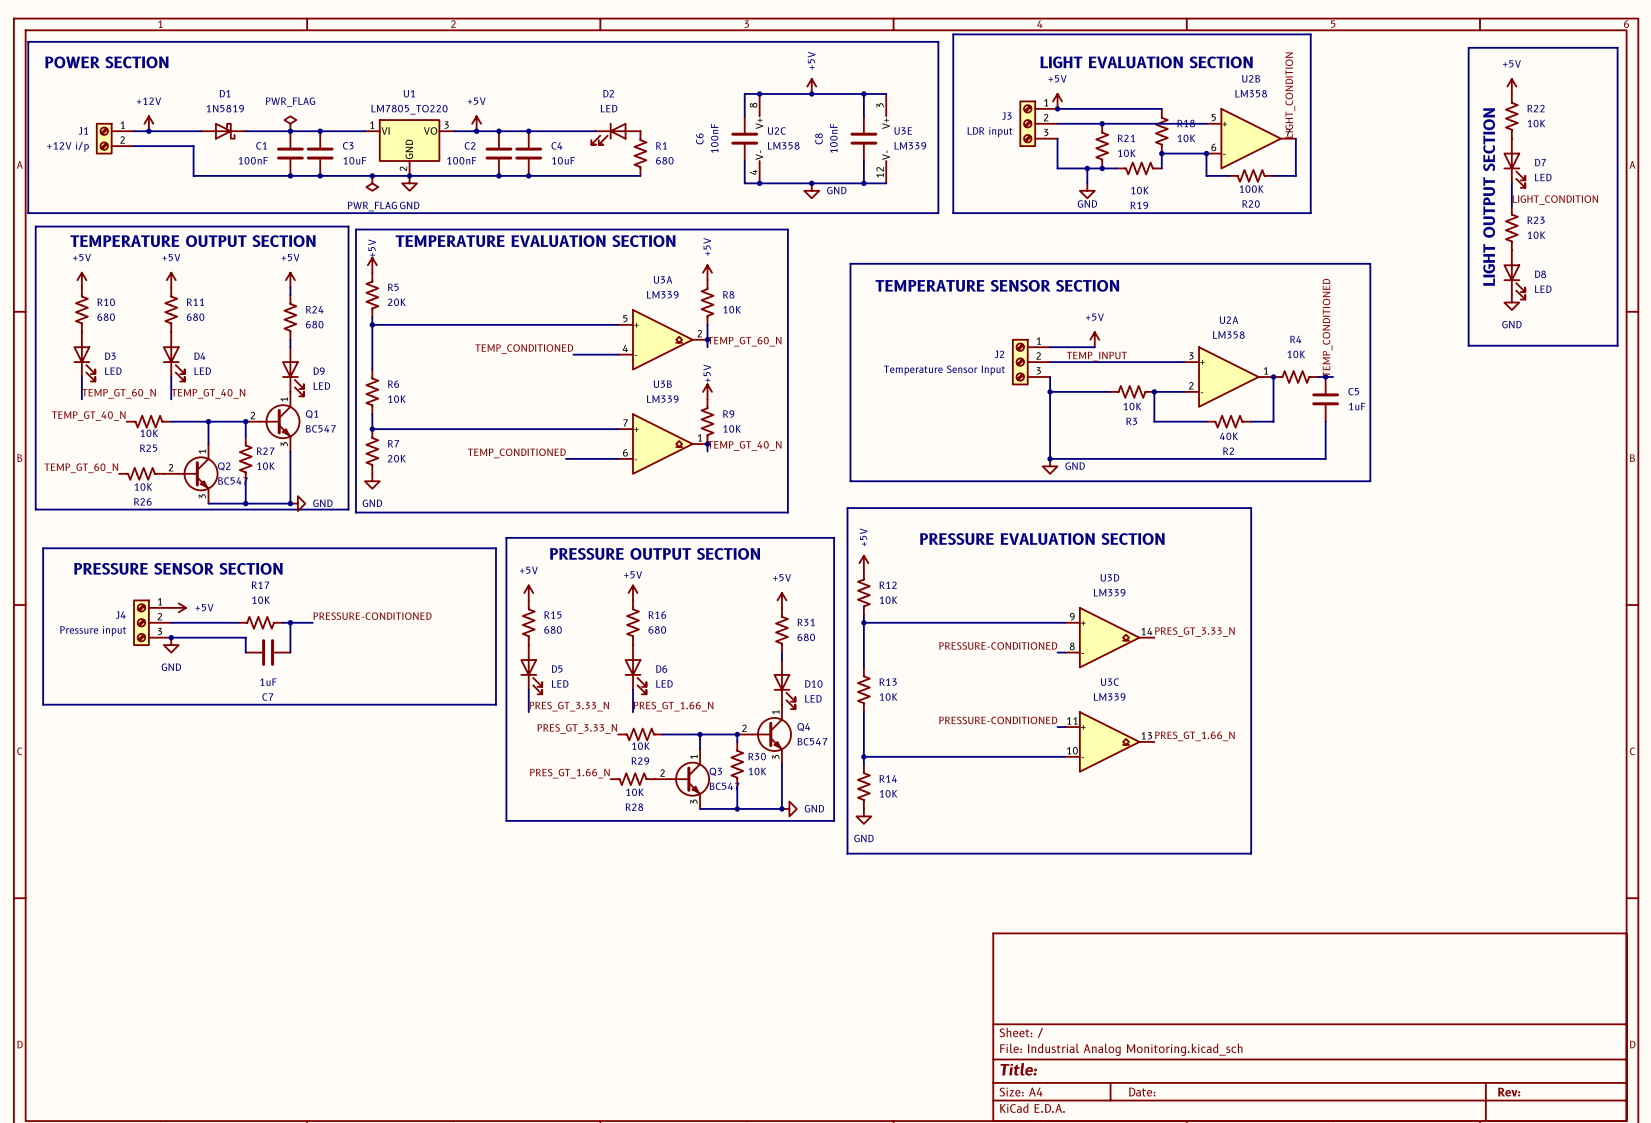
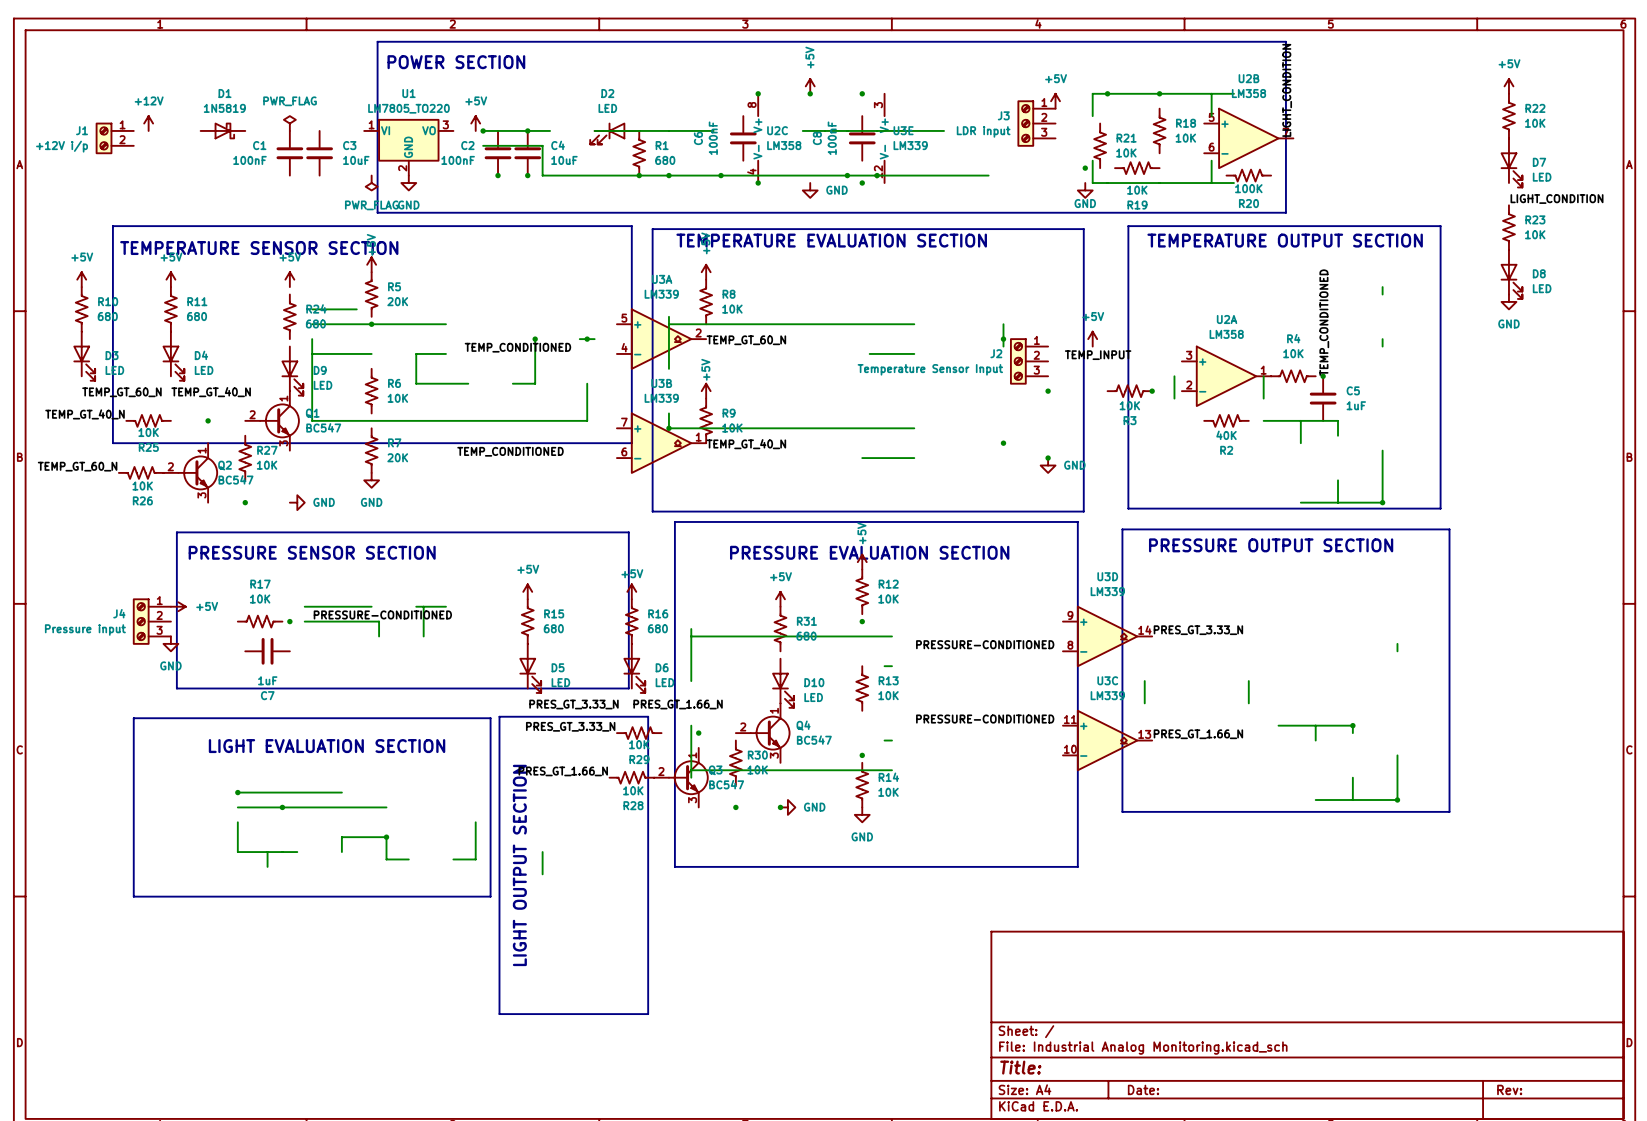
line: (378, 41) (28, 41) (28, 213) (378, 213) -> (377, 41) (377, 212)
line: (938, 41) (938, 213) -> (951, 212) (936, 212)
line: (1468, 47) (1617, 47) (1617, 345) (1468, 345) (1468, 47) -> none
text: POWER SECTION (106, 62) -> none
text: none -> POWER SECTION (456, 62)
text: LIGHT EVALUATION SECTION (1146, 62) -> none
wire: (863, 93) (863, 116) -> none
wire: (886, 93) (744, 93) (744, 116) -> none
junction: none -> (1107, 93)
junction: none -> (1159, 93)
wire: none -> (1211, 93) (1211, 116)
wire: none -> (1233, 93) (1092, 93) (1092, 116)
wire: (1057, 108) (1161, 108) -> none
junction: (1057, 108) -> none
wire: (1057, 123) (1206, 123) -> none
junction: (1102, 123) -> none
wire: (134, 131) (201, 131) -> none
junction: (148, 131) -> none
wire: (245, 131) (364, 131) -> none
junction: (290, 131) -> none
junction: (320, 131) -> none
wire: (454, 131) (484, 131) -> none
junction: (476, 131) -> none
junction: none -> (483, 130)
junction: (498, 131) -> none
wire: (551, 131) (595, 131) -> (713, 130) (594, 130)
wire: none -> (802, 130) (944, 130)
wire: (1057, 138) (1057, 168) (1117, 168) -> none
wire: (1295, 138) (1295, 175) (1273, 175) -> none
wire: (134, 146) (193, 146) (193, 175) (543, 175) -> (483, 145) (542, 145) (542, 175)
junction: (1161, 153) -> none
junction: (1206, 153) -> none
wire: (744, 161) (744, 183) (886, 183) -> none
wire: (863, 161) (863, 183) -> none
wire: none -> (1092, 160) (1092, 183) (1233, 183)
wire: none -> (1211, 160) (1211, 183)
wire: (1087, 168) (1087, 183) -> none
junction: (1102, 168) -> none
wire: (1161, 168) (1161, 153) (1206, 153) (1206, 175) (1228, 175) -> none
junction: (290, 175) -> none
junction: (320, 175) -> none
junction: (372, 175) -> none
junction: (409, 175) -> none
wire: none -> (639, 175) (988, 175)
junction: none -> (639, 175)
junction: none -> (668, 175)
junction: none -> (721, 175)
junction: none -> (847, 175)
junction: none -> (877, 175)
junction: (811, 183) -> none
wire: (1511, 183) (1511, 205) -> none
text: LIGHT OUTPUT SECTION (1489, 197) -> none
line: (953, 213) (953, 34) (1310, 34) (1310, 213) (1288, 213) -> (936, 41) (1285, 41) (1285, 212)
line: (113, 226) (35, 226) (35, 509) (348, 509) (348, 226) -> (112, 226) (112, 443) (631, 443) (631, 226) (347, 226)
line: none -> (1128, 226) (1440, 226) (1440, 508) (1128, 508) (1128, 226)
line: (653, 229) (355, 229) (355, 512) (653, 512) -> (652, 229) (652, 511)
line: (787, 229) (787, 512) -> (786, 229) (1083, 229) (1083, 511) (786, 511)
text: TEMPERATURE OUTPUT SECTION (192, 241) -> TEMPERATURE SENSOR SECTION (259, 248)
text: TEMPERATURE EVALUATION SECTION (535, 241) -> none
text: none -> TEMPERATURE EVALUATION SECTION (831, 240)
text: none -> TEMPERATURE OUTPUT SECTION (1285, 240)
line: (850, 263) (1370, 263) (1370, 481) (850, 481) (850, 263) -> none
text: TEMPERATURE SENSOR SECTION (997, 285) -> none
wire: (290, 287) (290, 295) -> none
wire: none -> (1382, 287) (1382, 294)
wire: none -> (312, 309) (356, 309)
wire: (372, 317) (372, 369) -> none
wire: none -> (668, 316) (668, 368)
wire: none -> (312, 324) (371, 324)
wire: (446, 324) (618, 324) -> none
wire: none -> (668, 324) (914, 324)
wire: (707, 324) (707, 347) -> none
wire: none -> (1003, 324) (1003, 346)
wire: (290, 339) (290, 347) -> none
wire: none -> (312, 339) (312, 420) (587, 420) (587, 383)
wire: none -> (535, 339) (535, 383) (512, 383)
junction: none -> (535, 339)
wire: none -> (579, 339) (594, 339)
junction: none -> (587, 339)
junction: (707, 339) -> none
junction: none -> (1003, 339)
wire: none -> (1382, 339) (1382, 346)
wire: (1050, 347) (1094, 347) -> none
wire: none -> (312, 353) (371, 353)
wire: none -> (445, 353) (416, 353) (416, 383) (468, 383)
wire: (573, 354) (618, 354) -> none
wire: none -> (869, 353) (914, 353)
wire: (1050, 362) (1184, 362) -> none
wire: (81, 376) (81, 399) -> none
wire: (171, 376) (171, 399) -> none
wire: (1050, 376) (1050, 458) (1325, 458) (1325, 421) -> none
wire: none -> (1174, 376) (1174, 398)
wire: none -> (1263, 376) (1263, 398)
wire: (1273, 376) (1273, 421) -> (1338, 435) (1338, 420) (1271, 420)
junction: (1273, 376) -> none
wire: (1318, 376) (1333, 376) -> none
wire: (1050, 391) (1109, 391) -> none
wire: (1184, 391) (1154, 391) (1154, 421) (1206, 421) -> none
wire: (372, 414) (372, 429) (618, 429) -> none
wire: none -> (668, 413) (668, 428) (914, 428)
wire: (171, 421) (245, 421) (245, 436) -> none
wire: (208, 421) (208, 444) -> none
junction: (245, 421) -> none
wire: (1251, 421) (1266, 421) -> none
wire: none -> (1300, 420) (1300, 443)
junction: (372, 429) -> none
junction: none -> (668, 428)
wire: (707, 444) (707, 451) -> none
junction: (707, 444) -> none
junction: none -> (1003, 443)
wire: (290, 451) (290, 503) (208, 503) -> none
wire: none -> (1382, 450) (1382, 502) (1300, 502)
wire: (565, 458) (618, 458) -> none
wire: none -> (862, 458) (914, 458)
wire: (245, 481) (245, 503) -> none
wire: none -> (1338, 480) (1338, 502)
junction: (290, 503) -> none
junction: none -> (1382, 502)
line: (847, 508) (1251, 508) (1251, 853) (847, 853) (847, 508) -> none
line: none -> (674, 521) (1077, 521) (1077, 866) (674, 866) (674, 521)
line: none -> (1122, 529) (1449, 529) (1449, 811) (1122, 811) (1122, 529)
line: (506, 537) (834, 537) (834, 820) (506, 820) (506, 537) -> none
text: PRESSURE EVALUATION SECTION (1042, 539) -> none
text: none -> PRESSURE OUTPUT SECTION (1271, 545)
line: (43, 548) (495, 548) (495, 704) (43, 704) (43, 548) -> (176, 532) (628, 532) (628, 688) (176, 688) (176, 532)
text: PRESSURE OUTPUT SECTION (654, 553) -> none
text: none -> PRESSURE EVALUATION SECTION (869, 552)
text position: PRESSURE SENSOR SECTION (178, 568) -> PRESSURE SENSOR SECTION (312, 552)
wire: none -> (416, 606) (445, 606)
wire: (863, 615) (863, 667) -> none
wire: (171, 622) (238, 622) -> (304, 606) (371, 606)
wire: (282, 622) (305, 622) -> none
wire: (290, 622) (290, 652) -> (423, 606) (423, 636)
wire: none -> (312, 621) (379, 621) (379, 636)
wire: (863, 622) (1064, 622) -> none
wire: none -> (691, 629) (691, 681)
wire: (171, 637) (245, 637) (245, 652) -> none
junction: (171, 637) -> none
wire: none -> (691, 636) (891, 636)
wire: none -> (1397, 643) (1397, 651)
wire: (781, 652) (781, 660) -> none
wire: (1057, 652) (1064, 652) -> none
wire: none -> (884, 666) (891, 666)
wire: none -> (1144, 681) (1144, 703)
wire: (528, 689) (528, 712) -> none
wire: (633, 689) (633, 712) -> none
wire: (863, 712) (863, 764) -> none
line: none -> (499, 716) (648, 716) (648, 1014) (499, 1014) (499, 716)
line: none -> (133, 718) (490, 718) (490, 896) (133, 896) (133, 718)
wire: none -> (691, 725) (691, 777)
wire: (1057, 727) (1064, 727) -> none
wire: none -> (1278, 725) (1352, 725) (1352, 733)
wire: none -> (1315, 725) (1315, 740)
junction: none -> (1352, 725)
wire: (662, 734) (737, 734) (737, 741) -> none
wire: (700, 734) (700, 749) -> none
junction: (737, 734) -> none
wire: none -> (884, 740) (891, 740)
text: none -> LIGHT EVALUATION SECTION (327, 746)
wire: (863, 756) (1064, 756) -> none
wire: none -> (1397, 755) (1397, 800) (1315, 800)
wire: (781, 764) (781, 808) (700, 808) -> none
wire: none -> (691, 770) (891, 770)
wire: none -> (1352, 777) (1352, 800)
wire: (737, 786) (737, 808) -> none
wire: none -> (237, 792) (341, 792)
junction: none -> (237, 792)
junction: none -> (1397, 800)
wire: none -> (237, 807) (386, 807)
junction: none -> (282, 807)
wire: none -> (237, 822) (237, 852) (297, 852)
wire: none -> (475, 822) (475, 859) (453, 859)
junction: none -> (386, 837)
wire: none -> (267, 852) (267, 866)
wire: none -> (341, 852) (341, 837) (386, 837) (386, 859) (408, 859)
wire: none -> (542, 852) (542, 874)
text: none -> LIGHT OUTPUT SECTION (519, 865)

